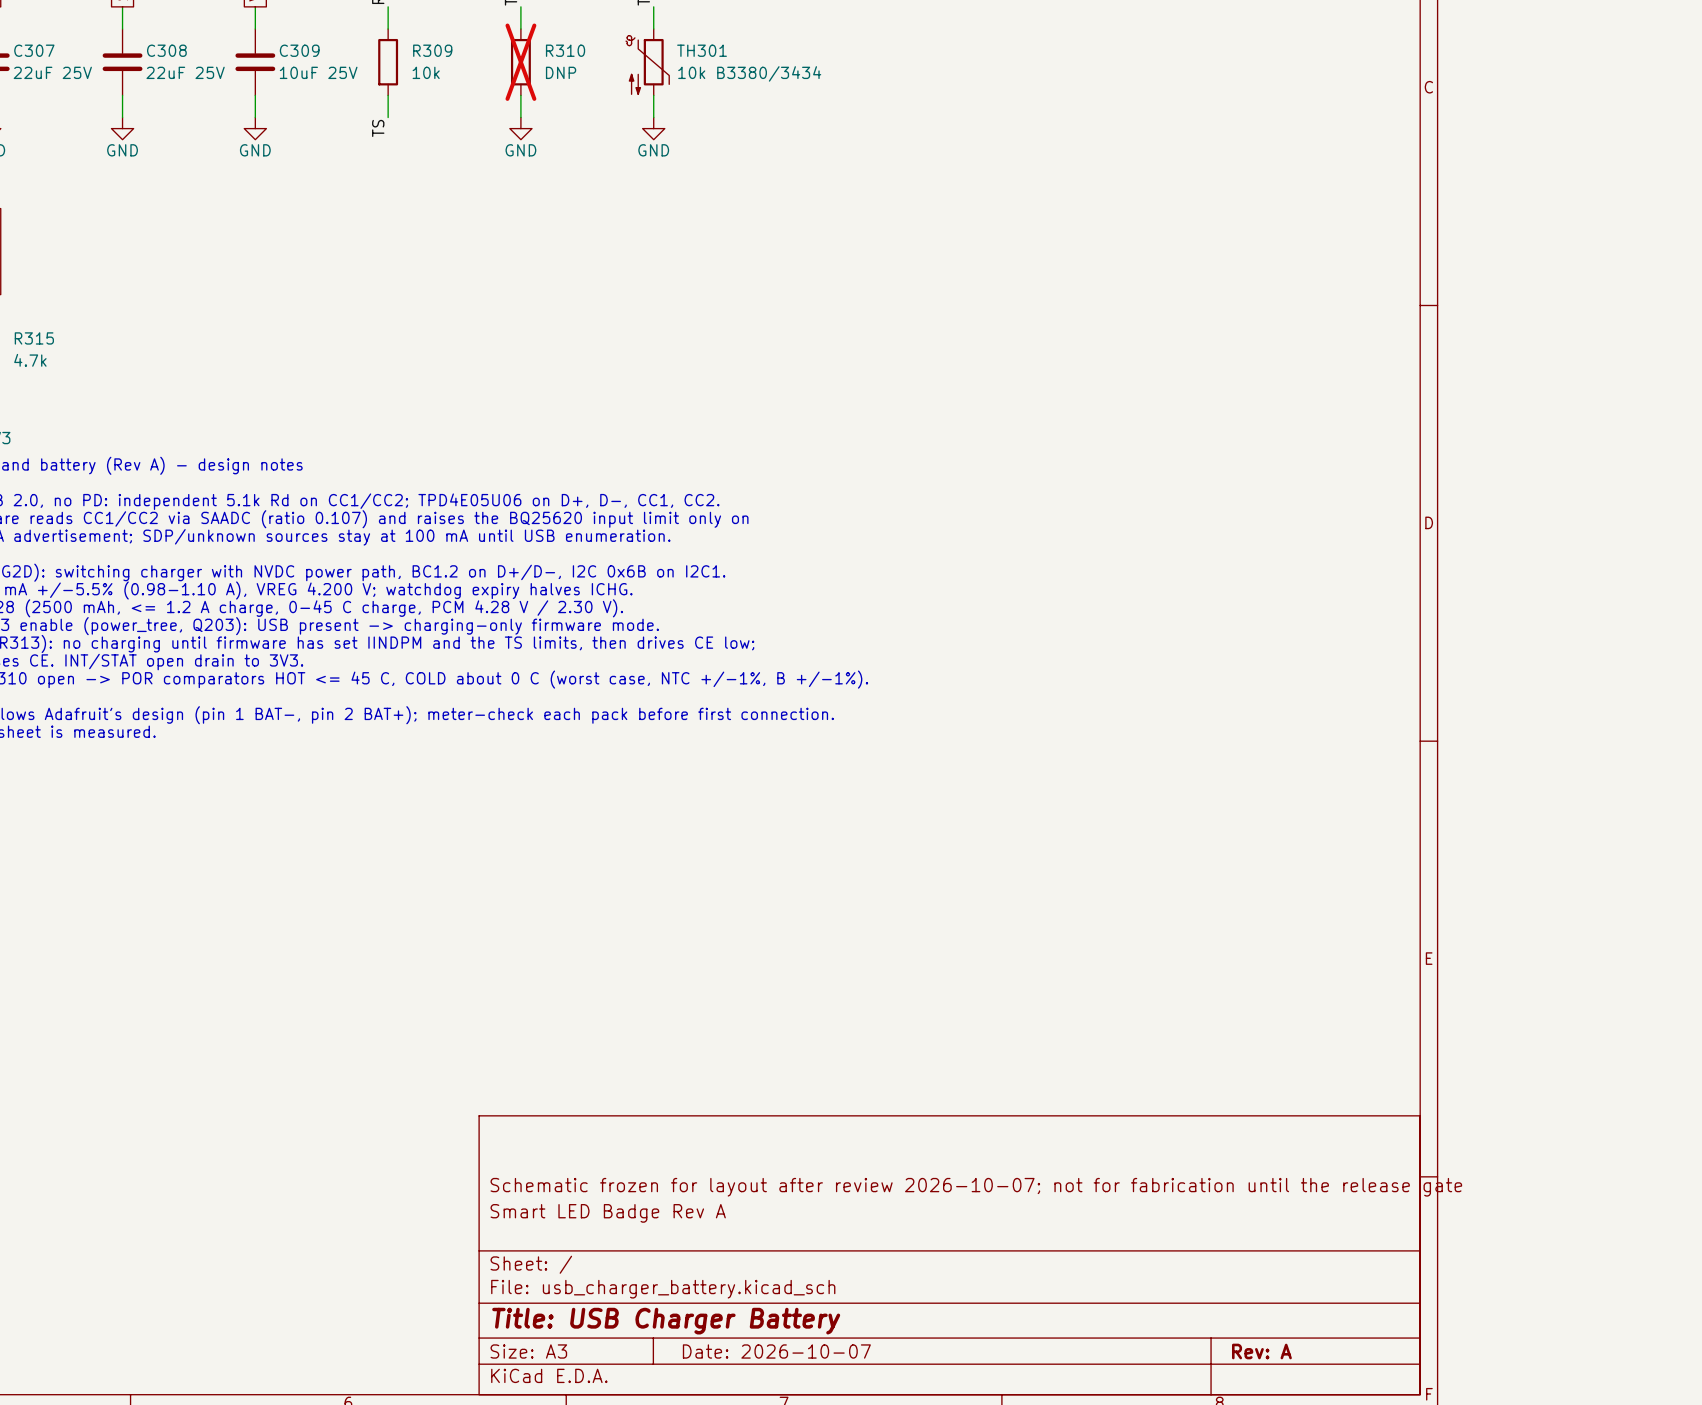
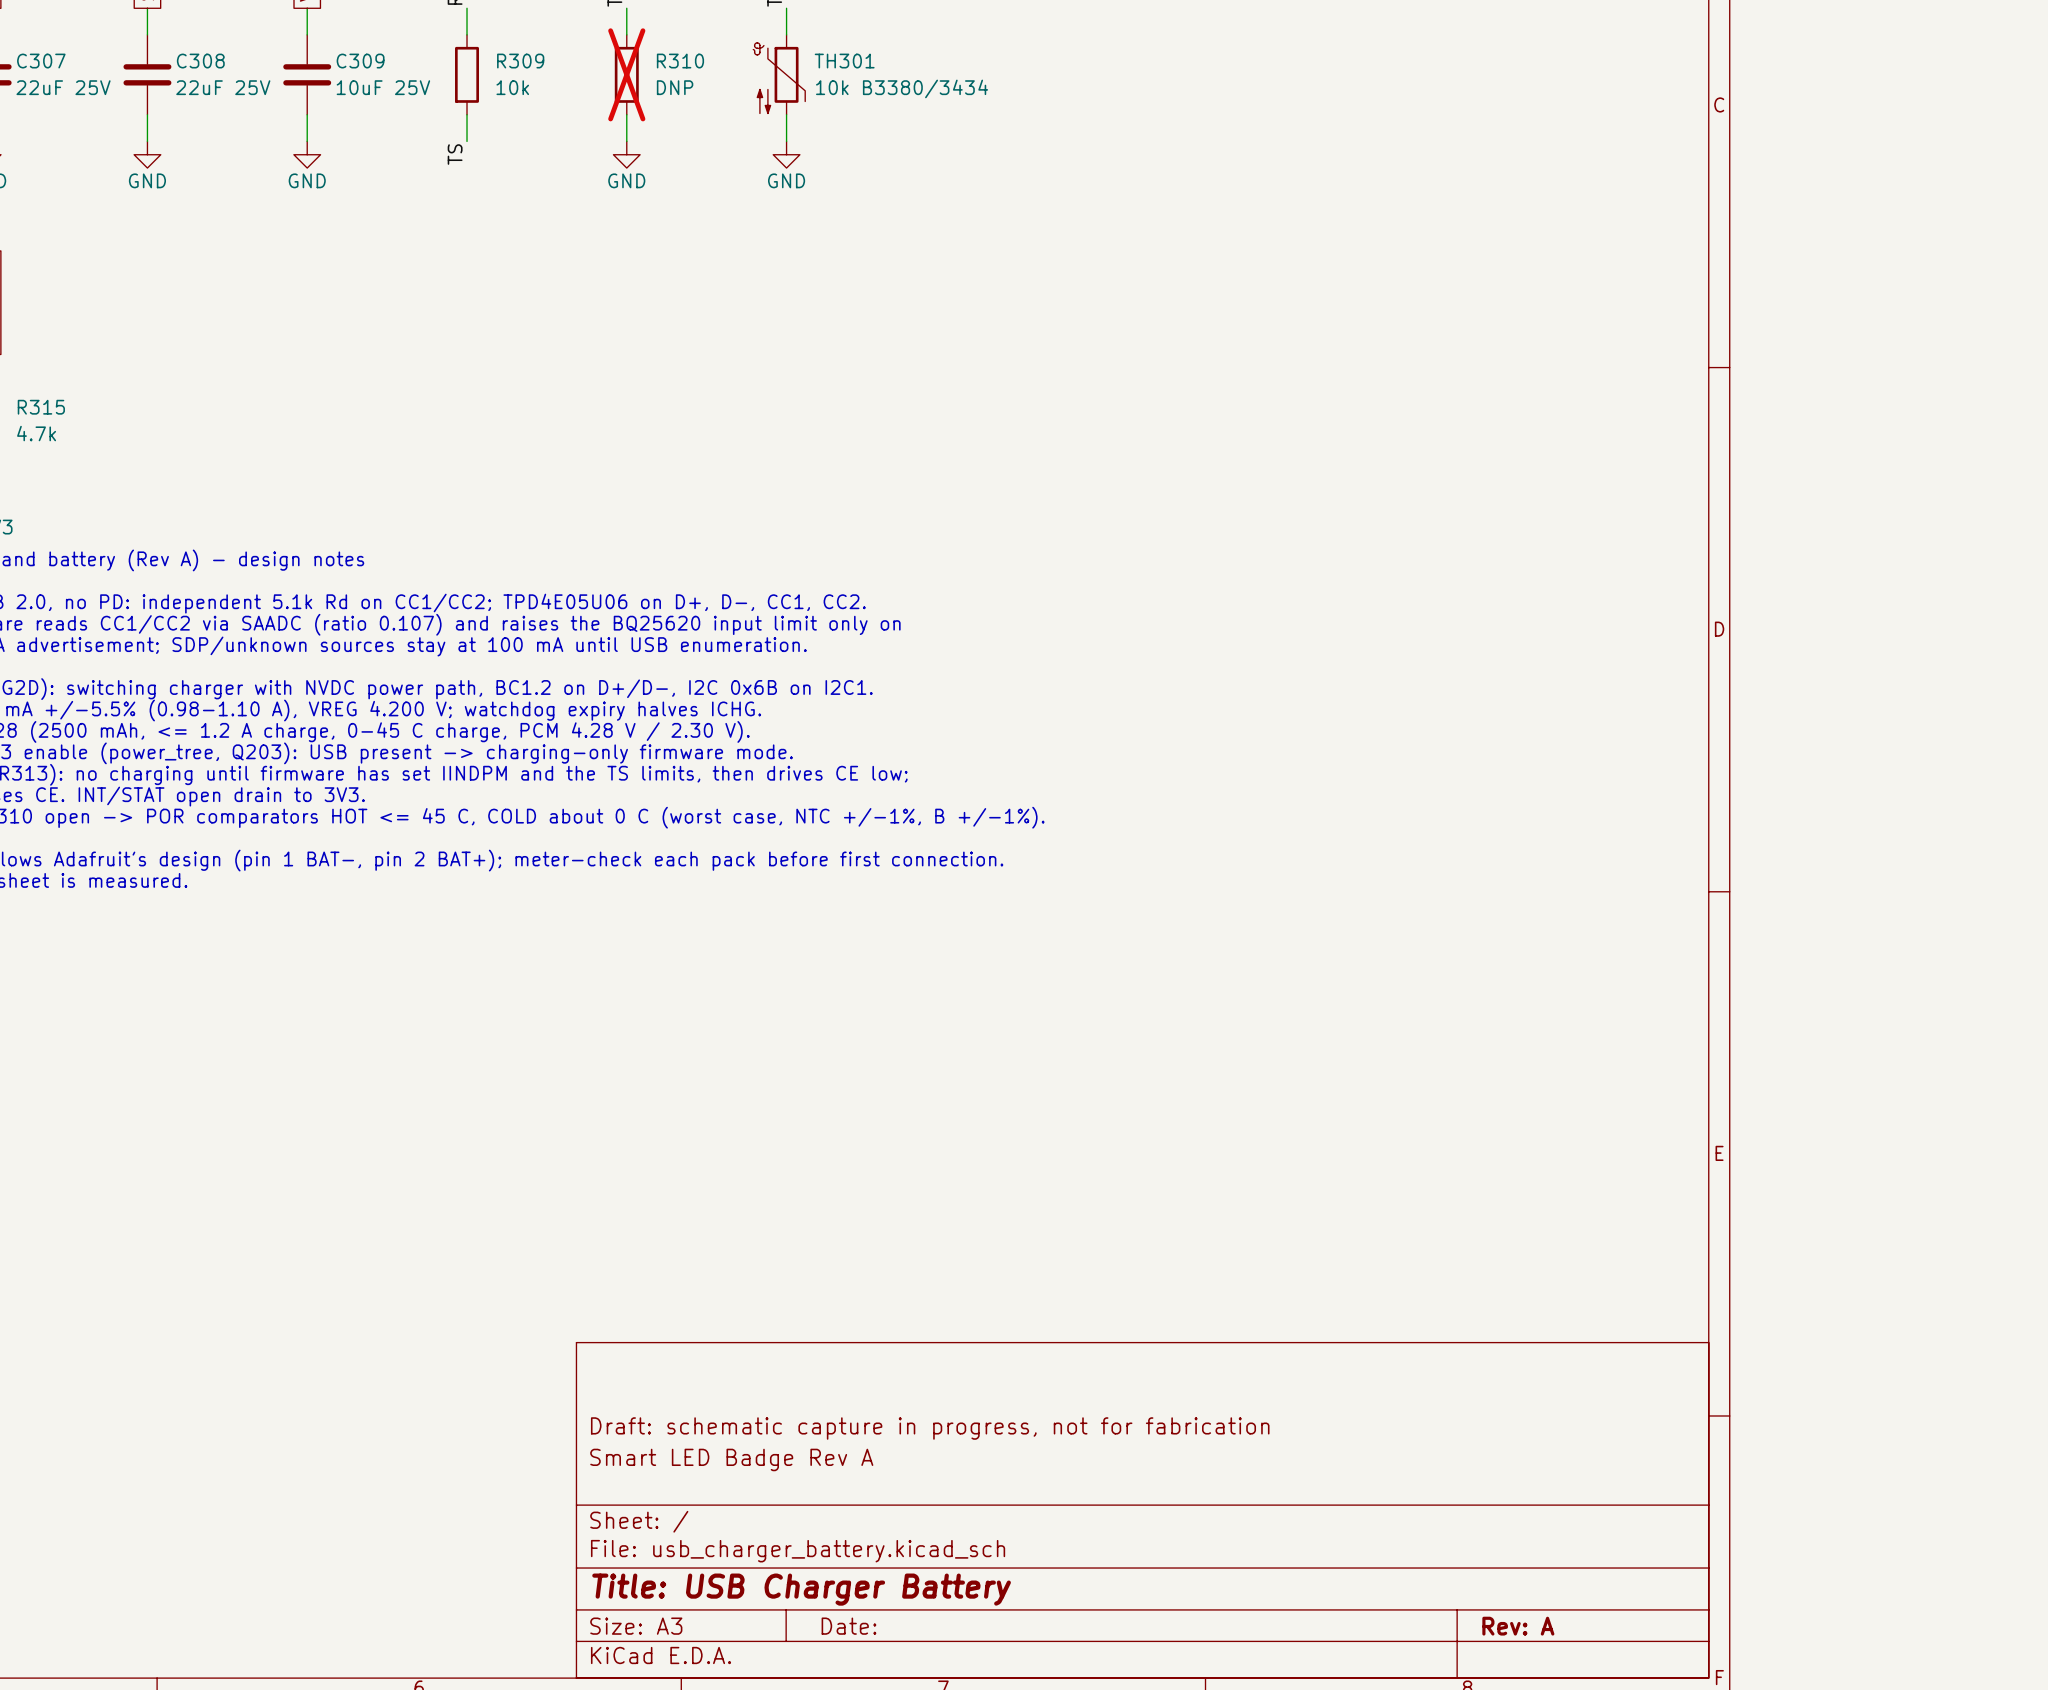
title block: Schematic frozen for layout after review 2026-10-07; not for fabrication until the release gate (976, 1187) -> Draft: schematic capture in progress, not for fabrication (930, 1428)
title block: Date: 2026-10-07 (776, 1351) -> Date: (848, 1626)

